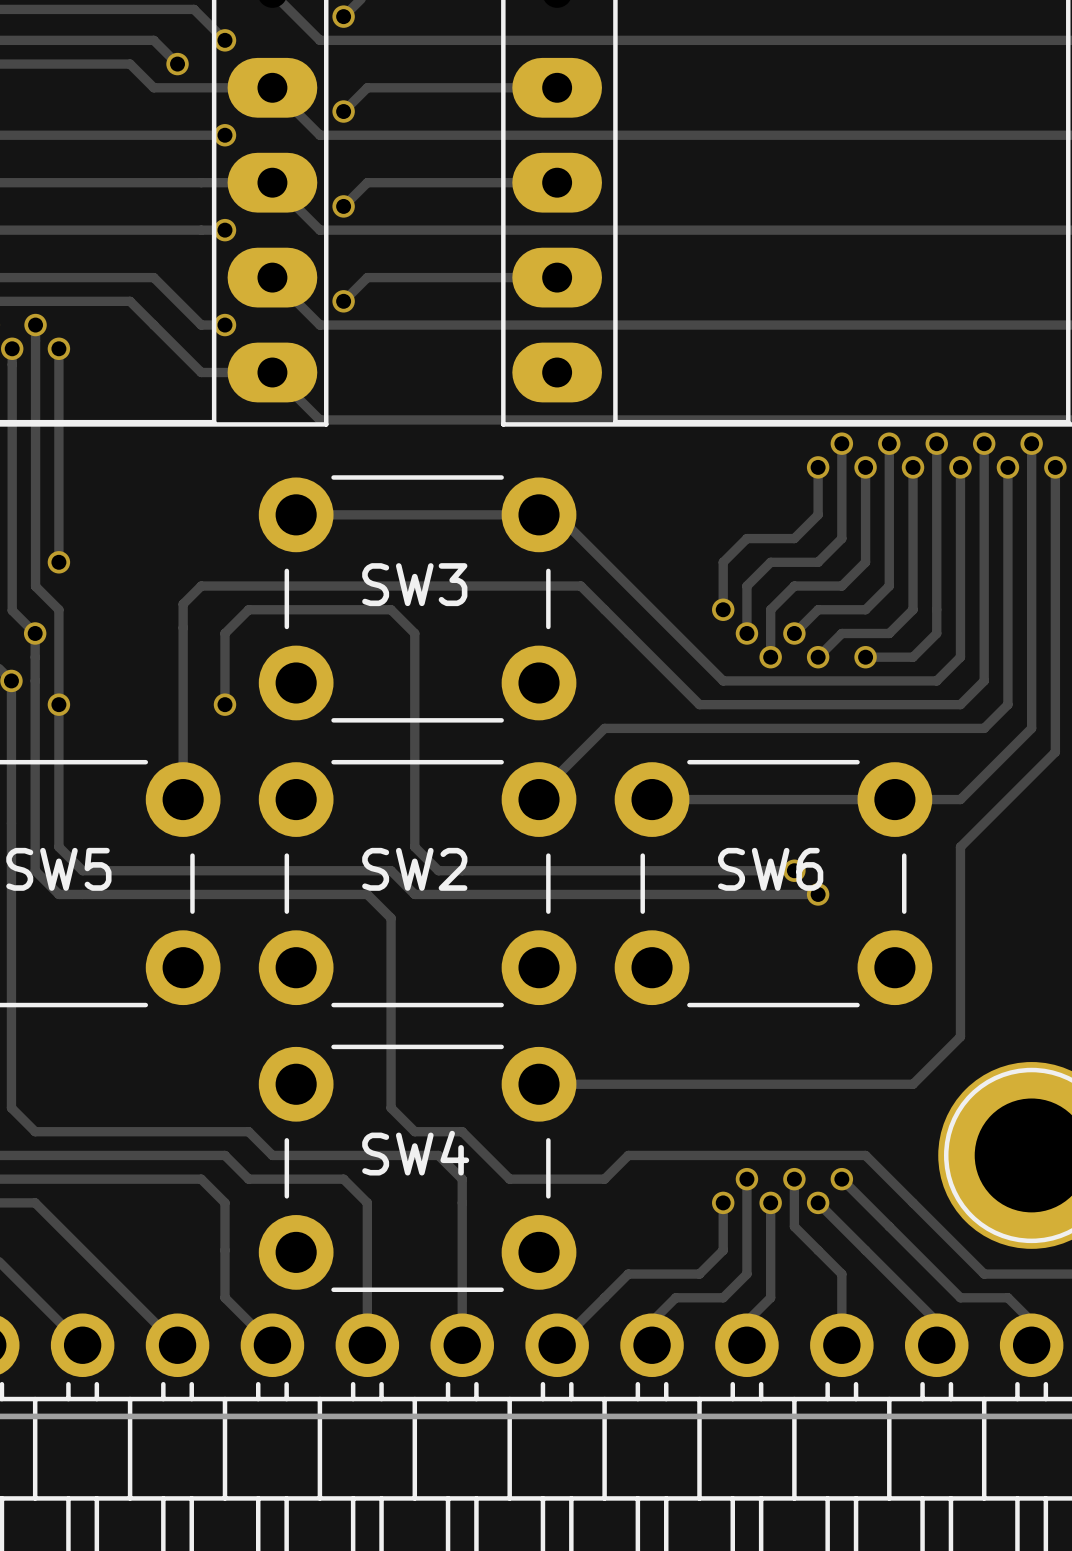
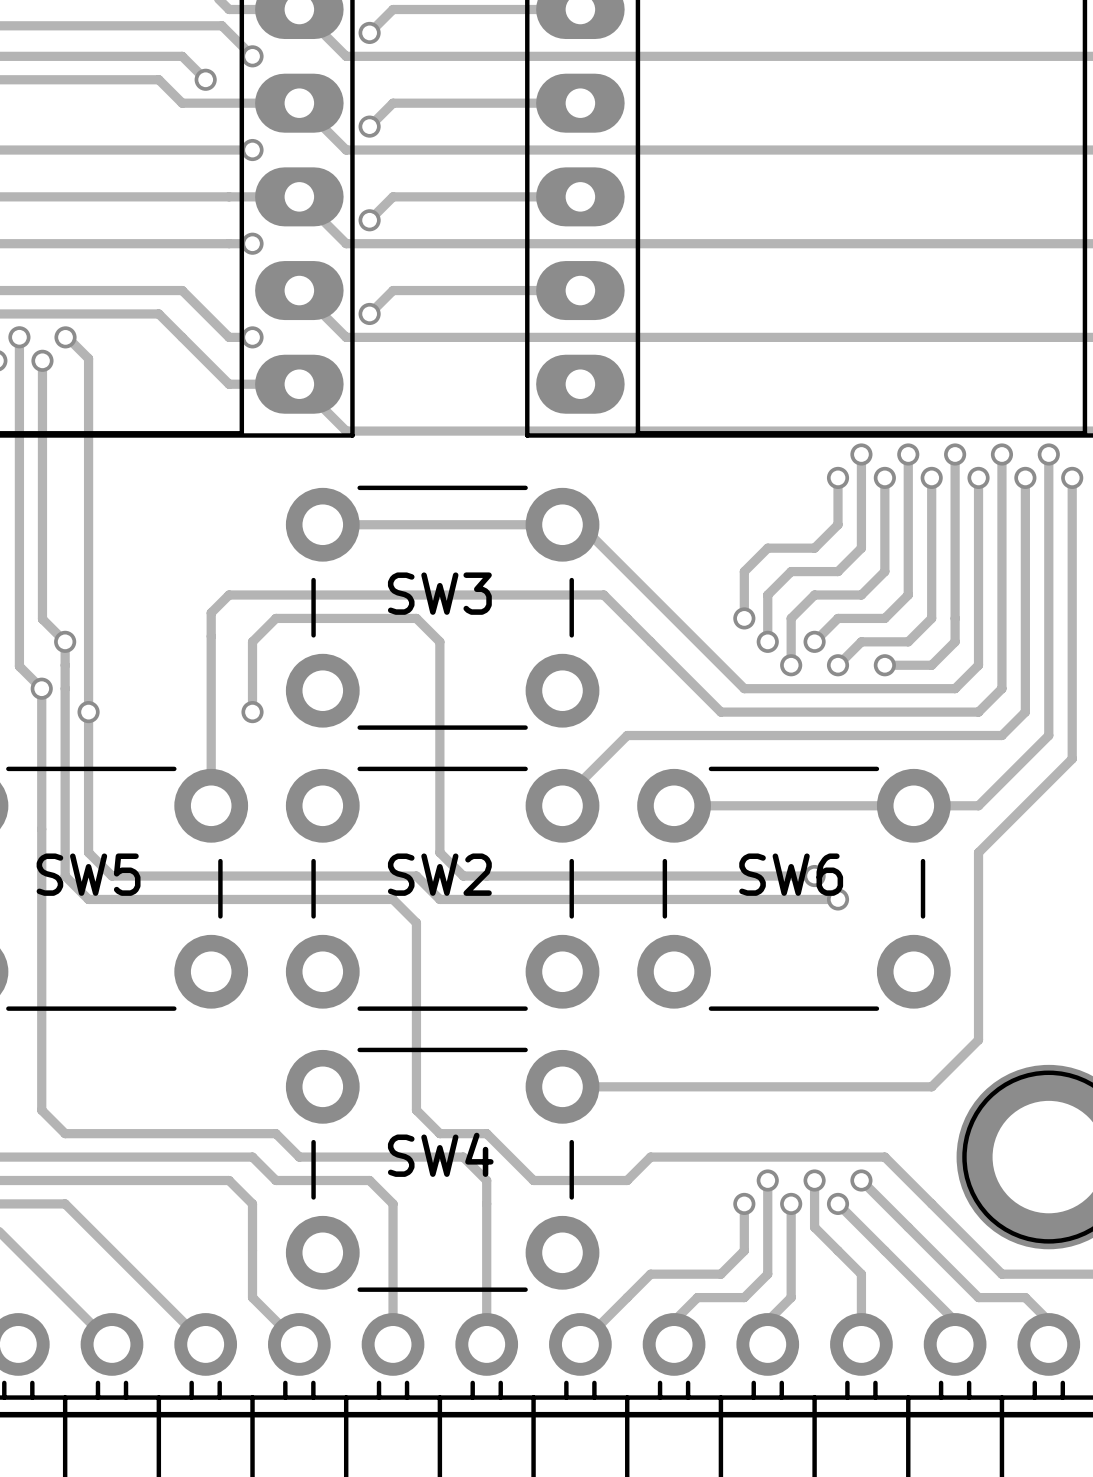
track: (35, 325) (35, 586) (58, 609) -> (88, 571) (88, 618)
track: none -> (67, 337) (88, 360)
via: (58, 348) -> none
via: (58, 562) -> none

